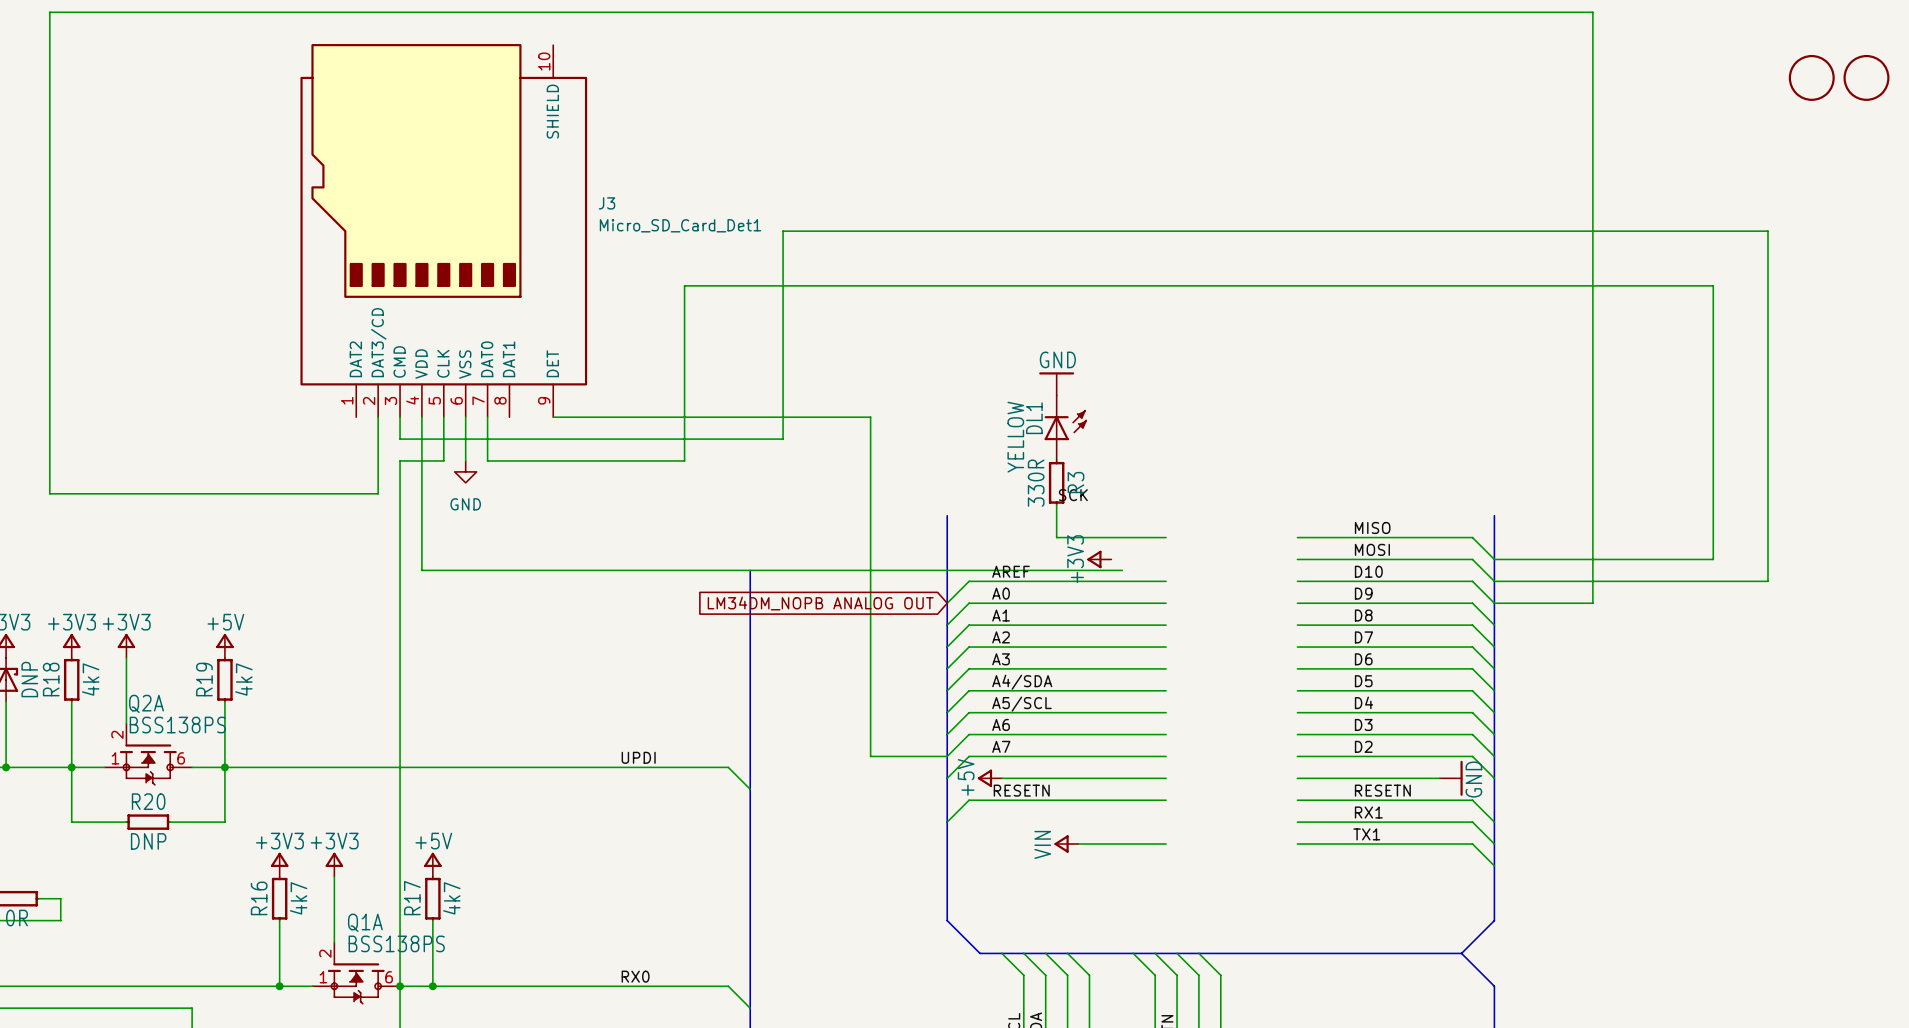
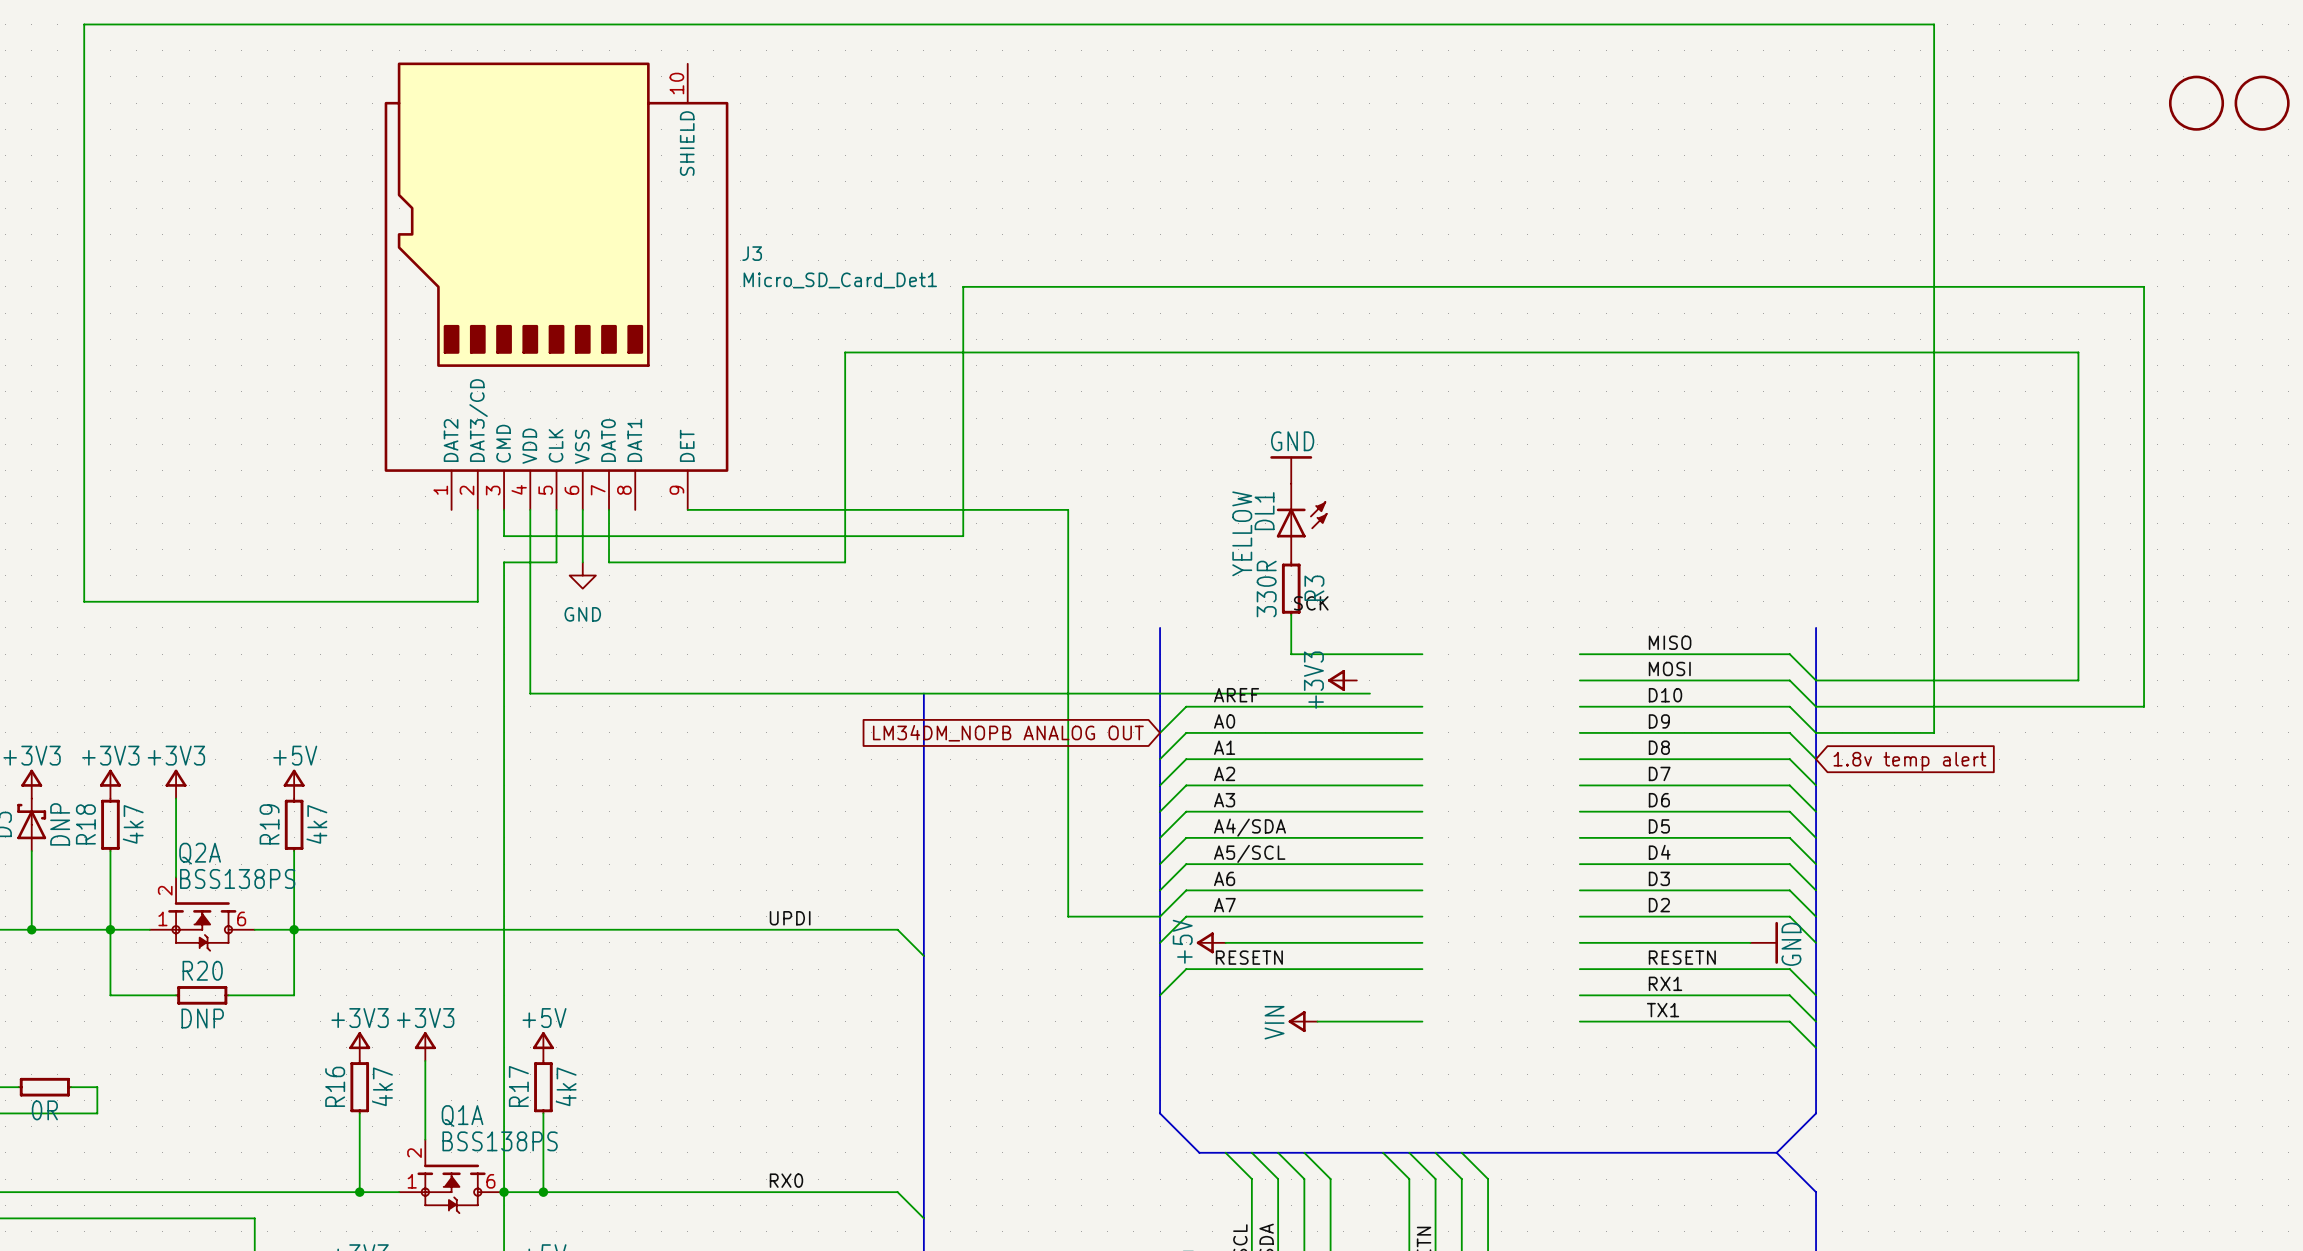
global label: none -> 1.8v temp alert (1909, 761)

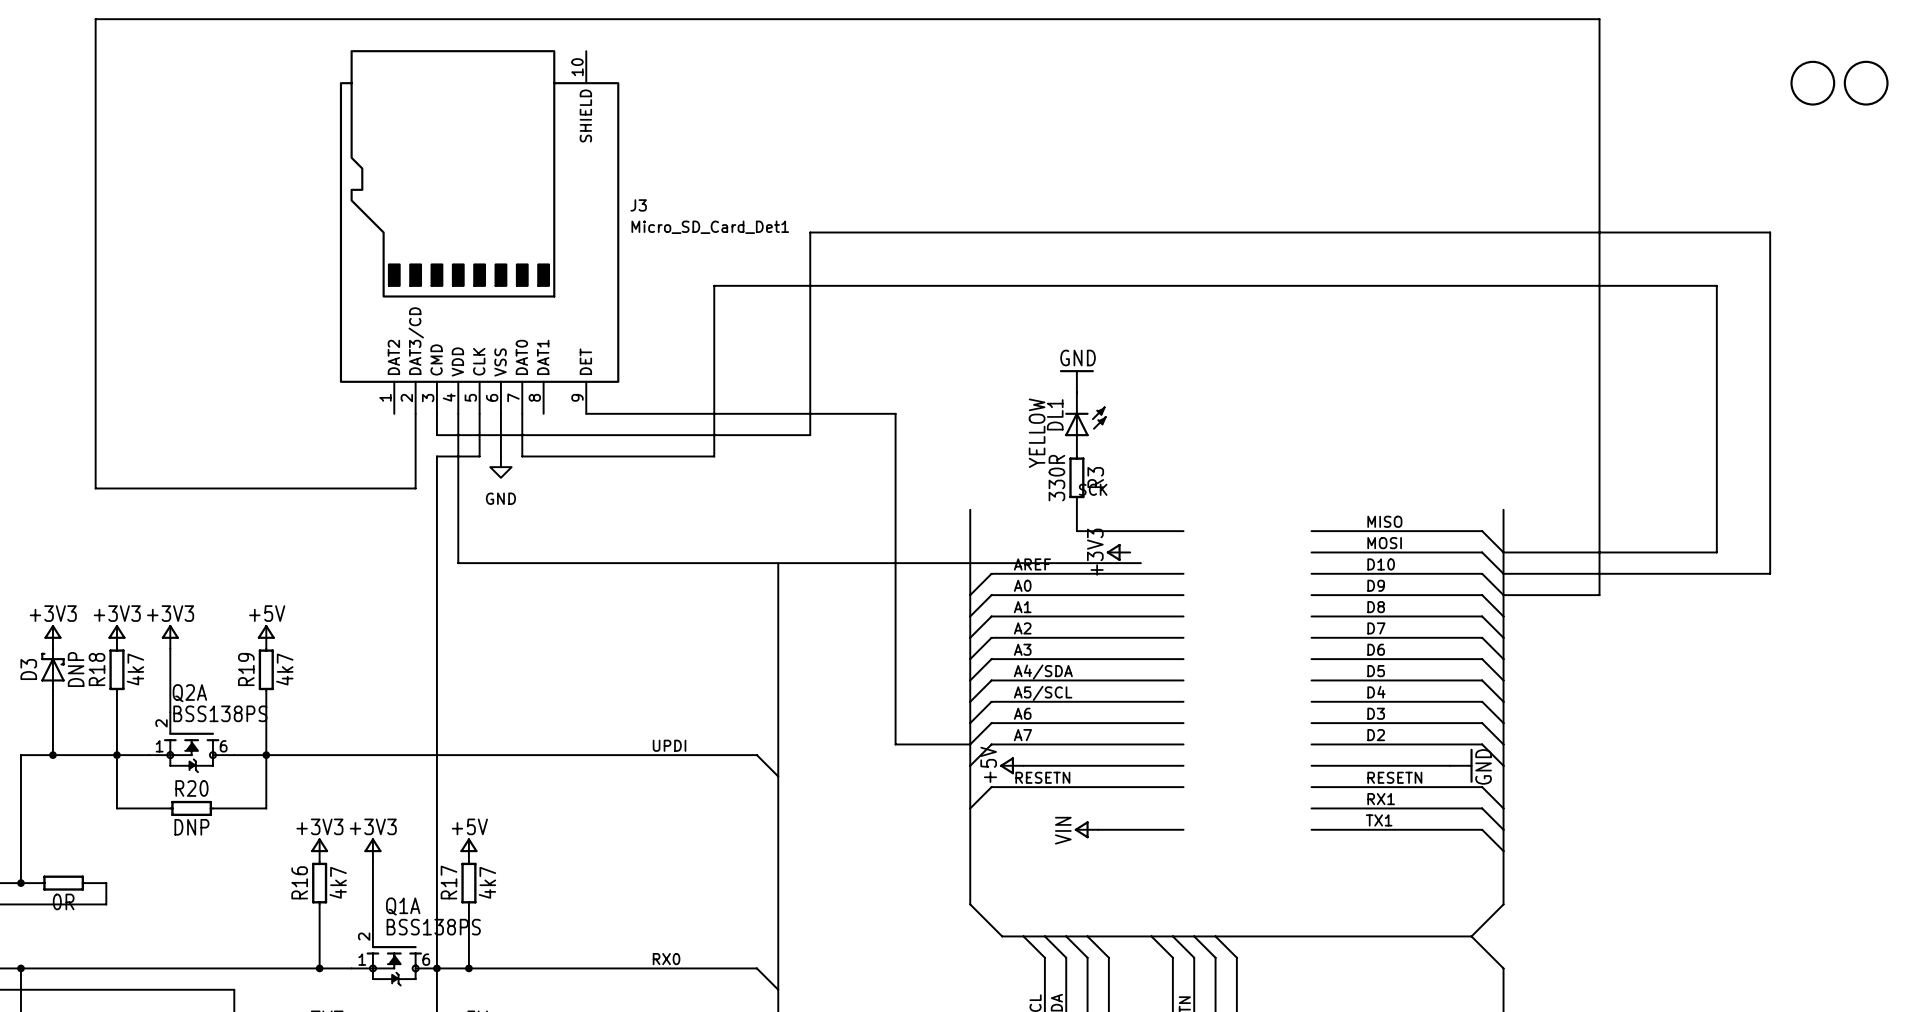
global label: LM34DM_NOPB ANALOG OUT (1008, 733) -> none
global label: 1.8v temp alert (1909, 761) -> none

